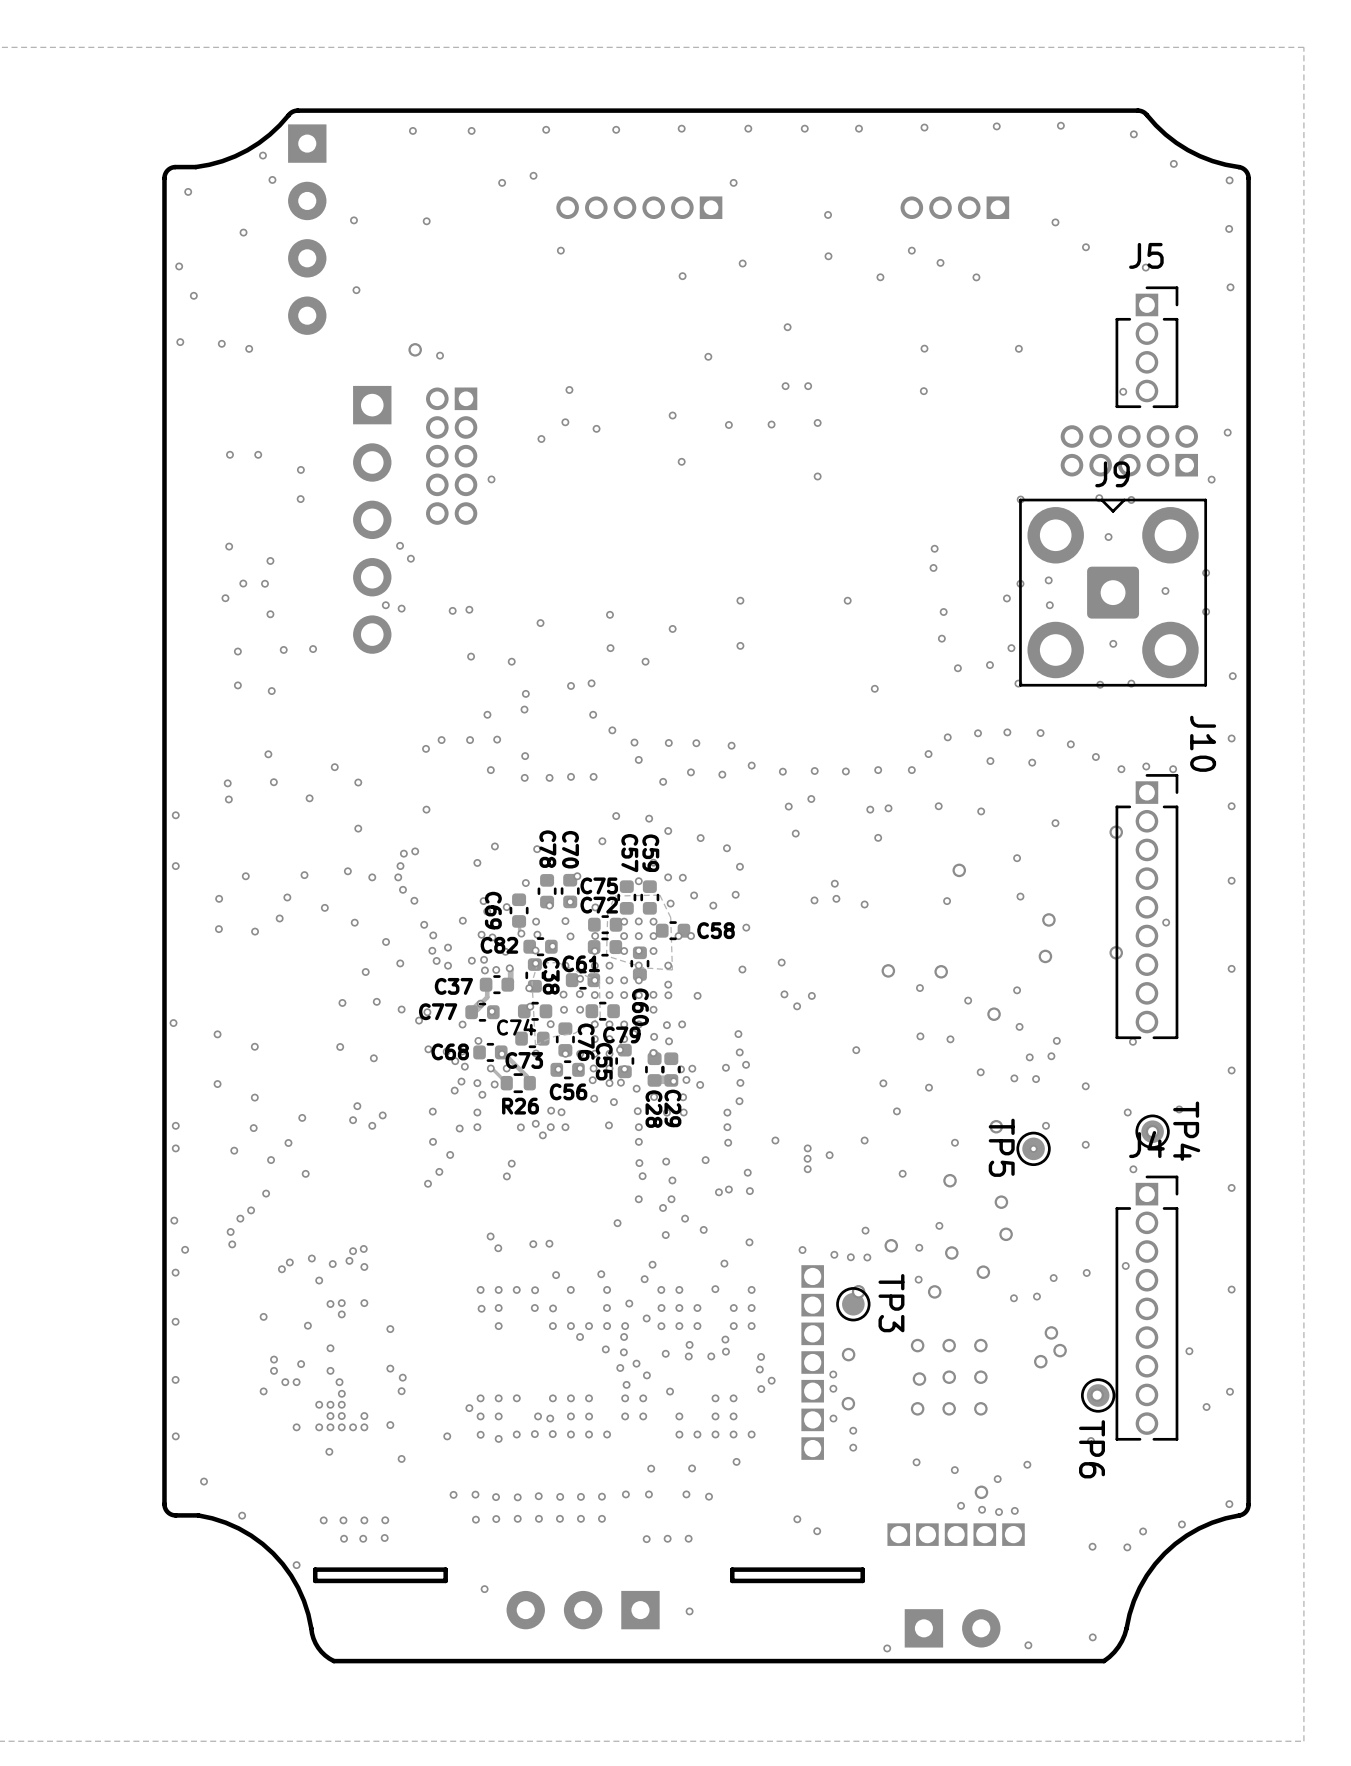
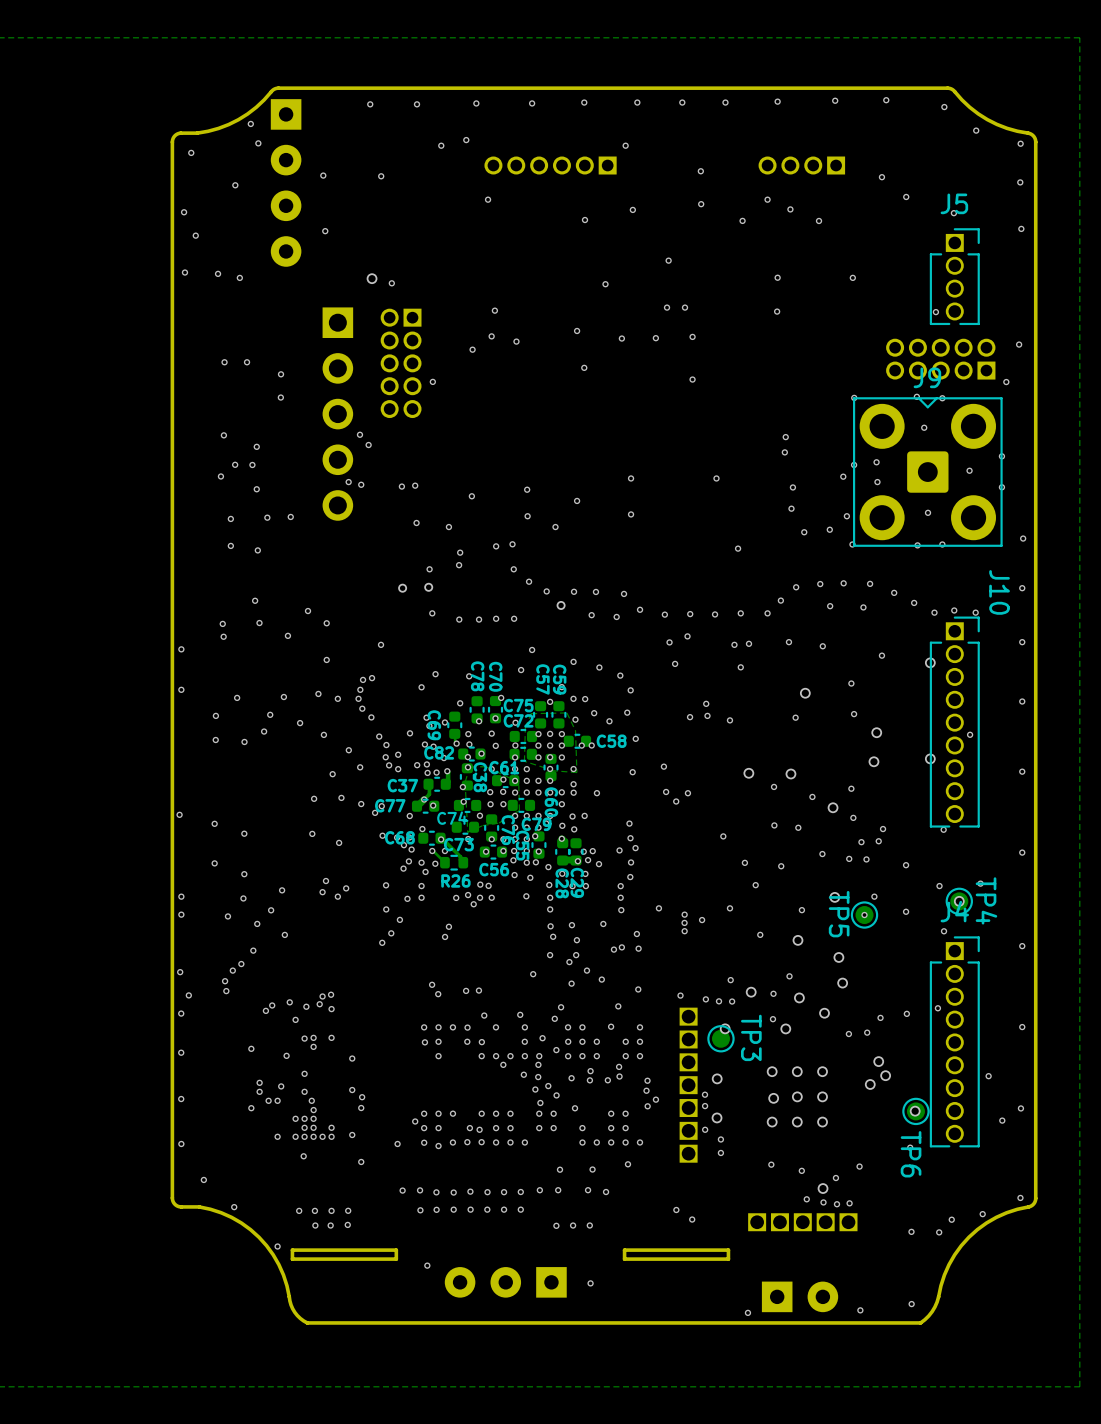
via: none -> (428, 587)
via: none -> (402, 588)
via: (497, 739) -> none
via: (441, 740) -> none
via: (470, 740) -> none
via: (426, 748) -> none
via: (525, 756) -> none
via: (638, 759) -> none
via: none -> (561, 605)
via: (663, 781) -> none
via: (649, 818) -> none

